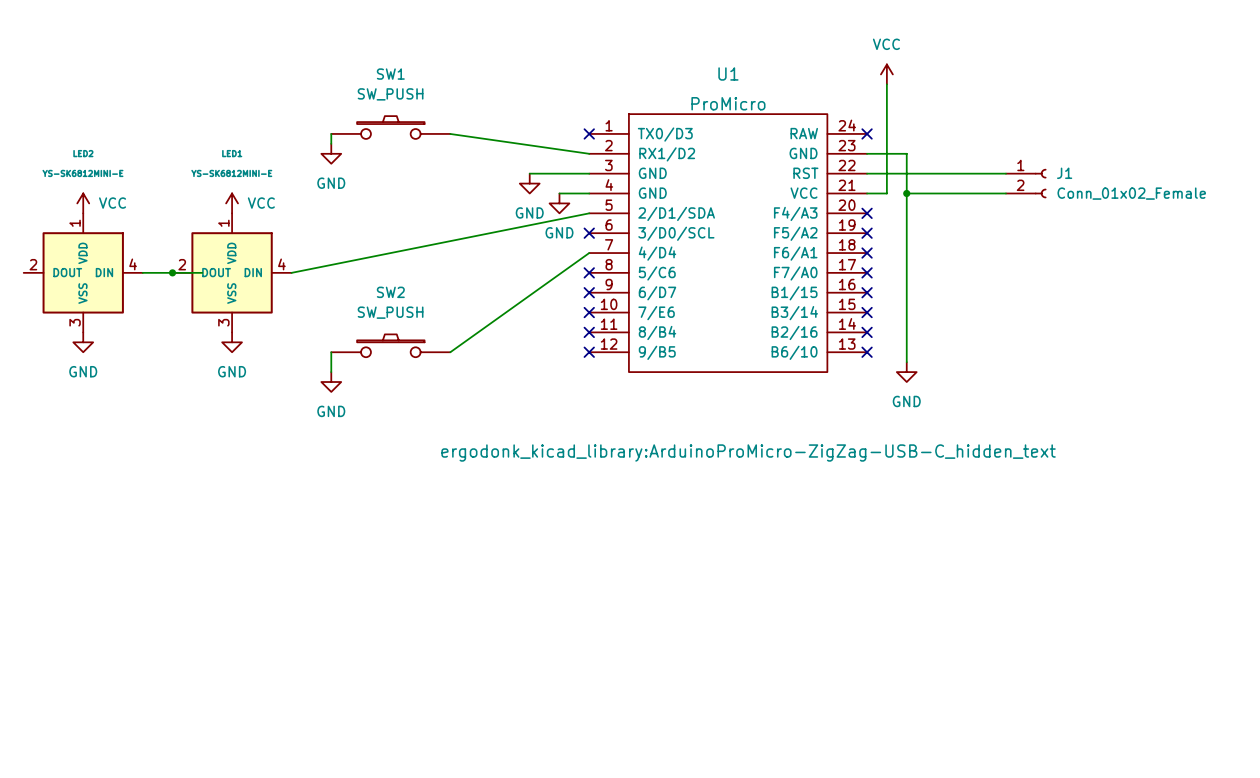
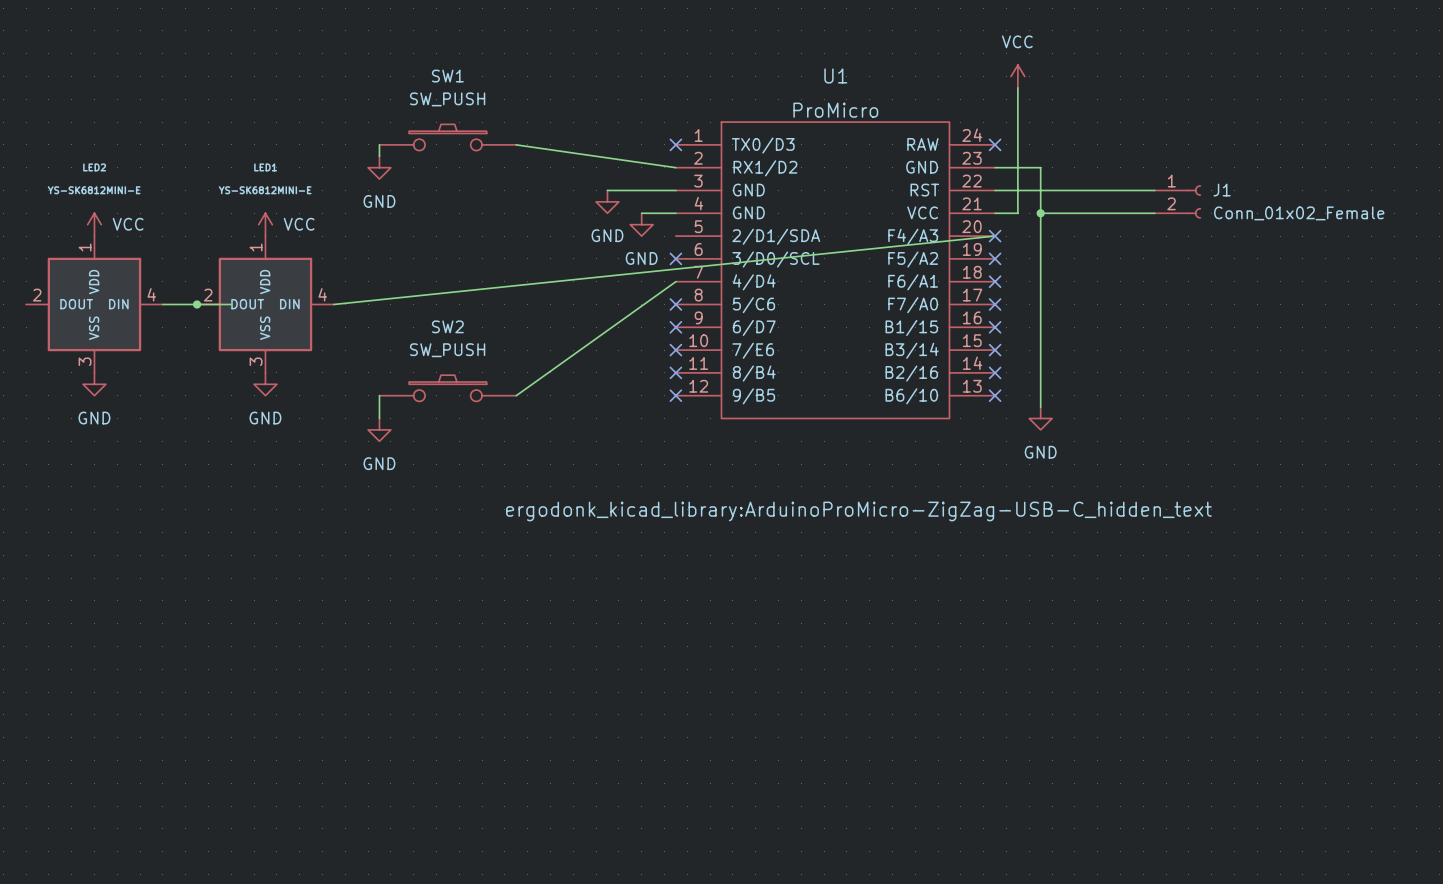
wire: (589, 213) (291, 272) -> (995, 236) (333, 304)

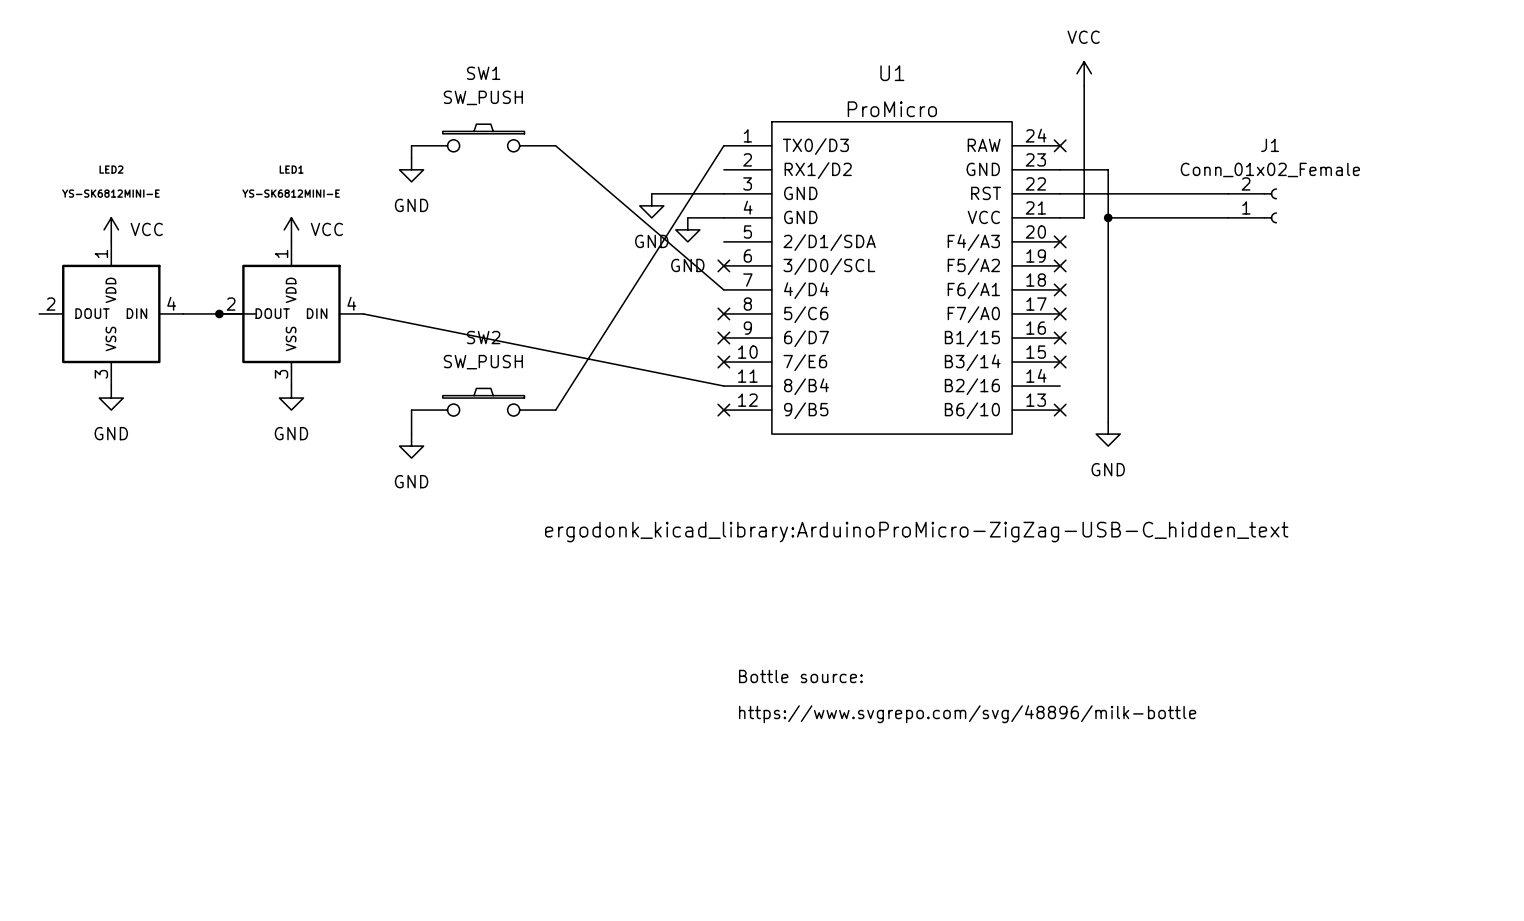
wire: (516, 144) (675, 167) -> (555, 145) (723, 289)
no-connect mark: (675, 144) -> none
J1 name position: J1 (1222, 190) -> J1 (1270, 145)
J1 flip: as is (1194, 201) -> up-down (1270, 205)
J1 value position: Conn_01x02_Female (1299, 213) -> Conn_01x02_Female (1270, 169)
wire: (995, 236) (333, 304) -> (723, 386) (363, 313)
wire: (675, 281) (516, 395) -> (723, 145) (555, 410)
no-connect mark: (675, 372) -> none
no-connect mark: (995, 372) -> none
text: none -> Bottle source: (800, 676)
text: none -> https://www.svgrepo.com/svg/48896/milk-bottle (967, 714)

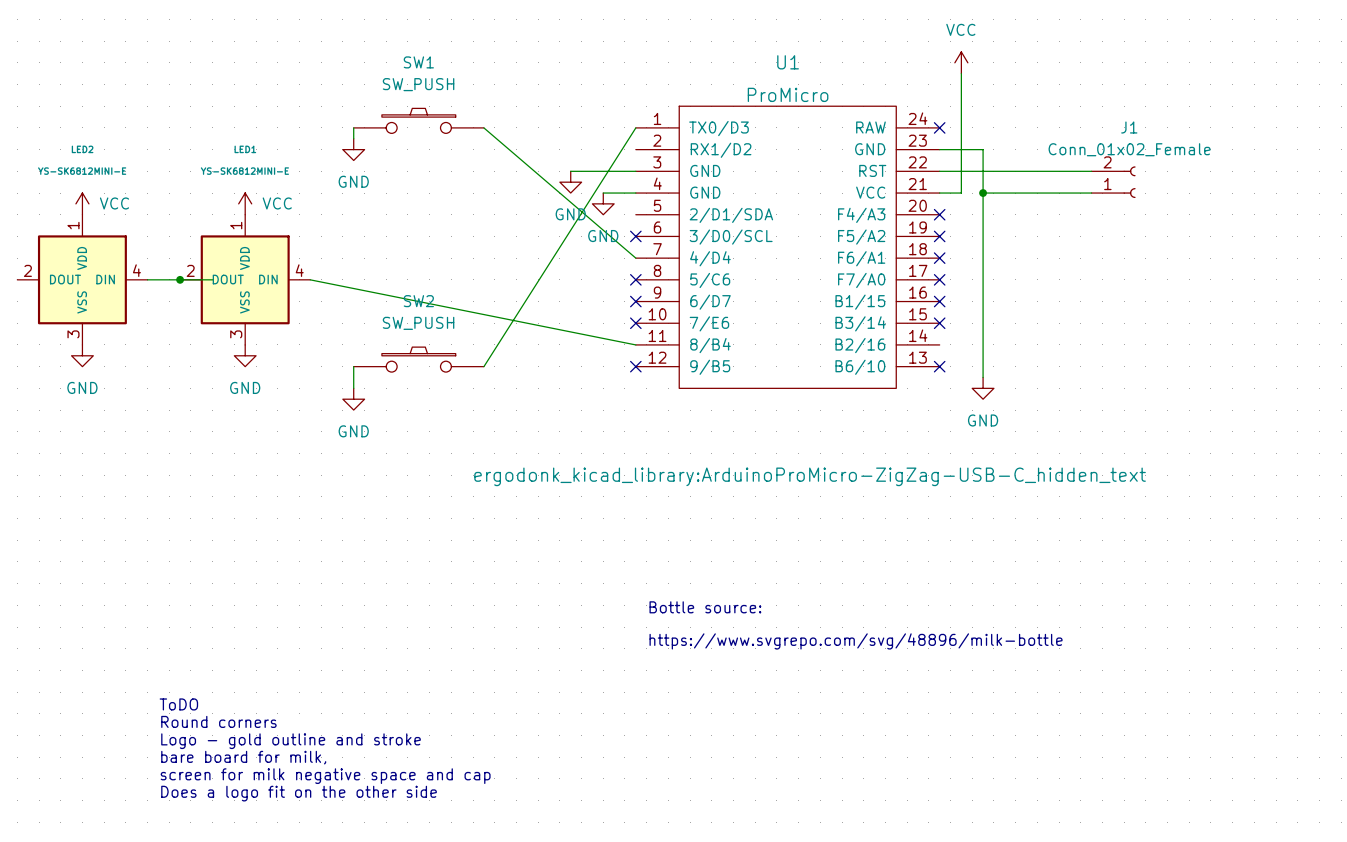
text: none -> ToDO (178, 704)
text: none -> Round corners (218, 721)
text: none -> Logo - gold outline and stroke (291, 741)
text: none -> bare board for milk, (243, 757)
text: none -> screen for milk negative space and cap (325, 776)
text: none -> Does a logo fit on the other side (299, 793)

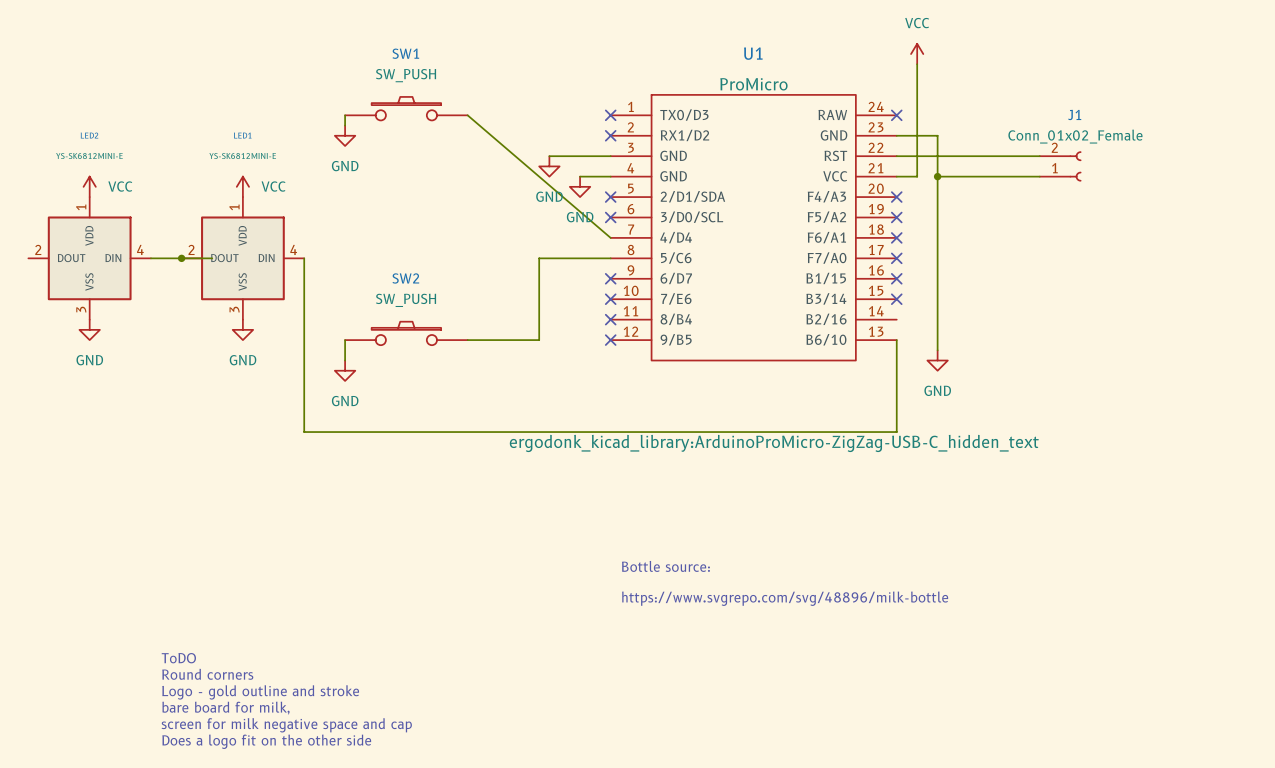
wire: (635, 127) (483, 366) -> (610, 258) (539, 258) (539, 340) (467, 340)
no-connect mark: none -> (610, 115)
no-connect mark: none -> (610, 135)
no-connect mark: none -> (610, 197)
wire: (310, 279) (635, 344) -> (304, 258) (304, 432) (896, 432) (896, 340)
no-connect mark: (635, 279) -> none
no-connect mark: none -> (610, 319)
no-connect mark: (939, 366) -> none

